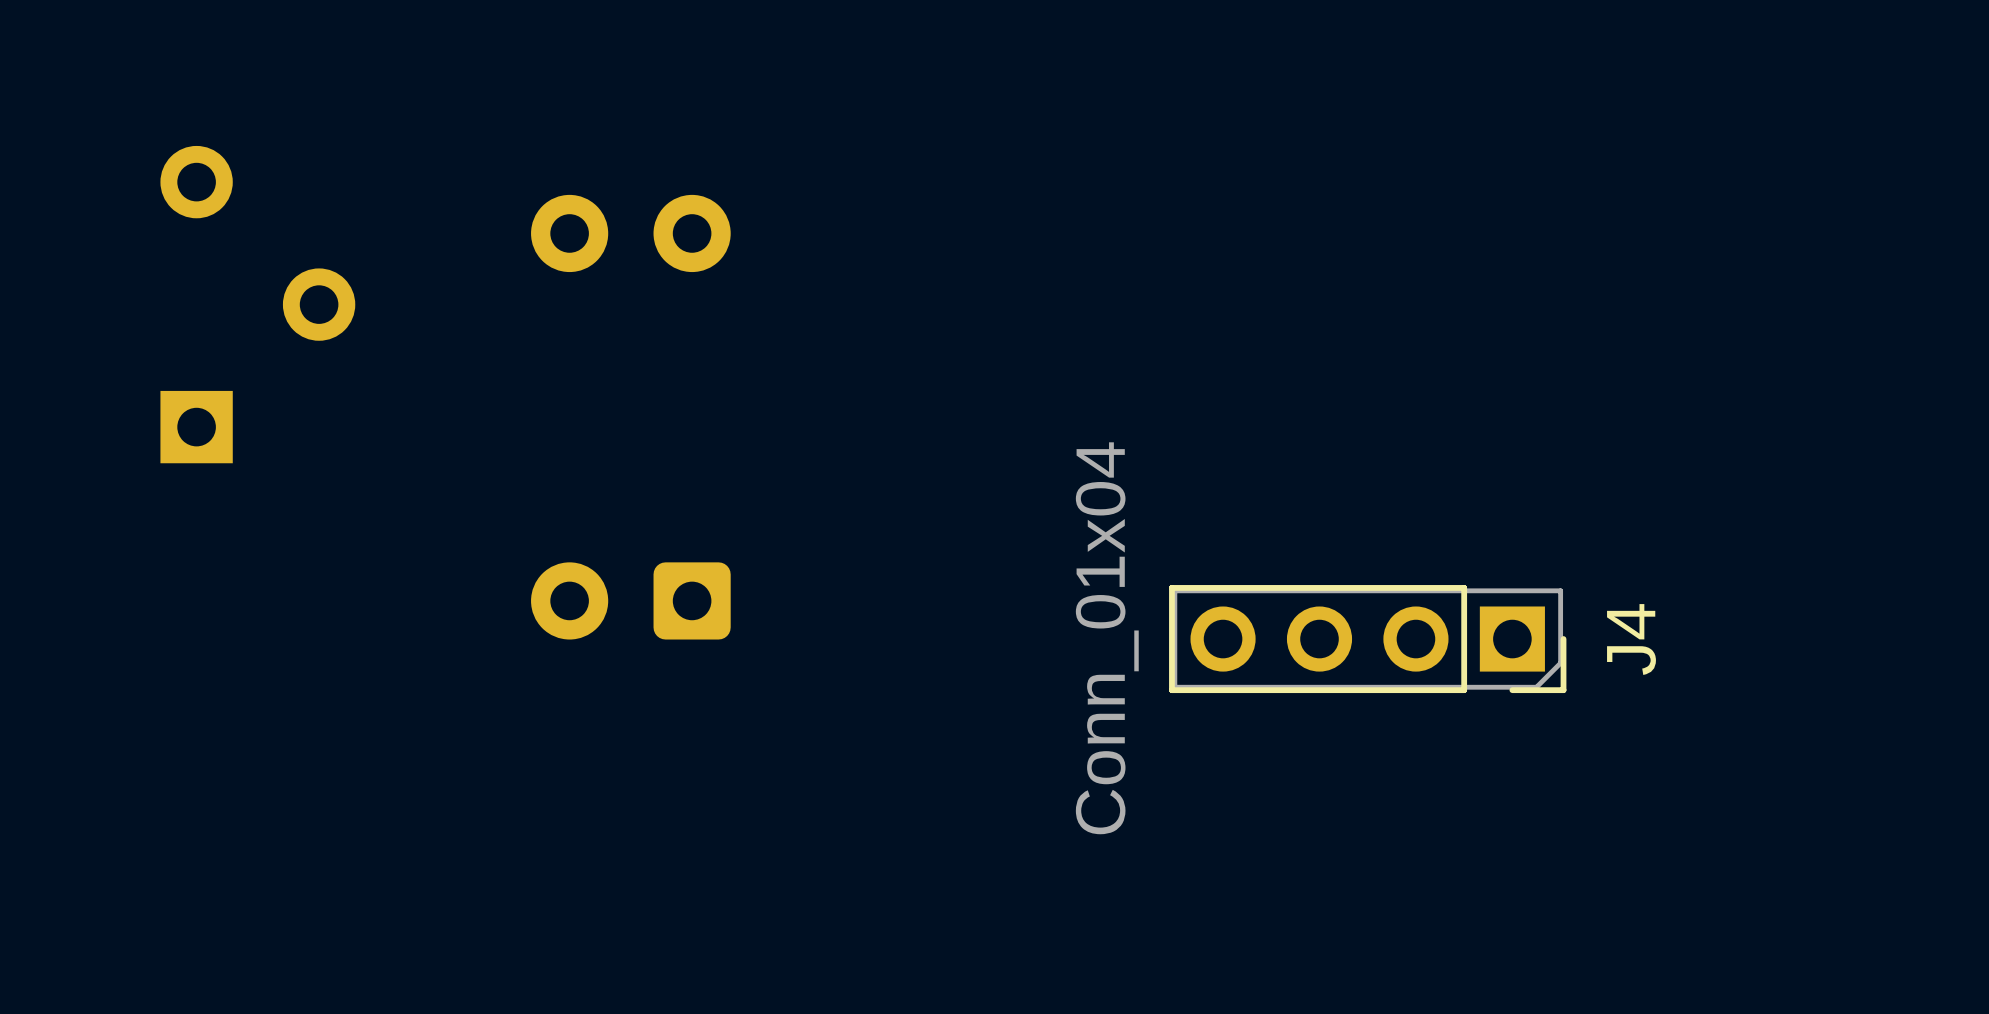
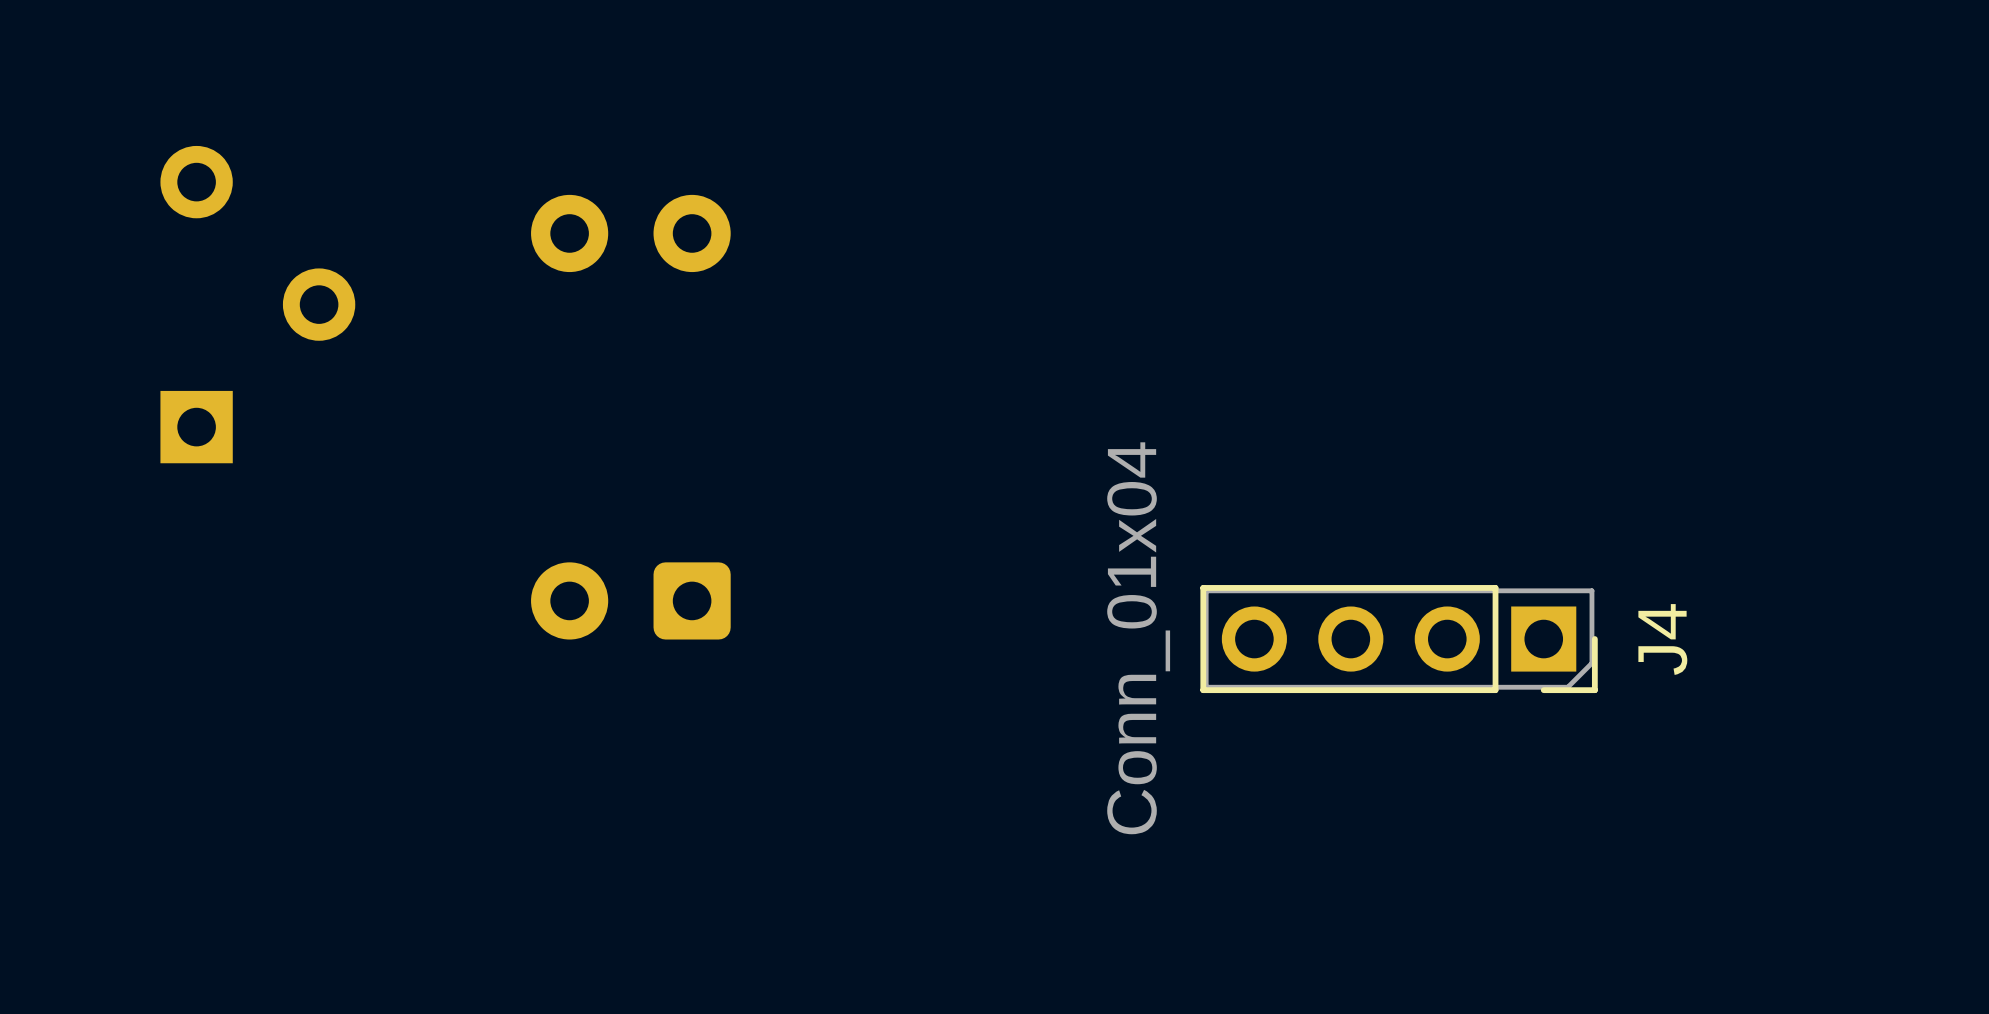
J4 position: (1367, 639) -> (1399, 639)

